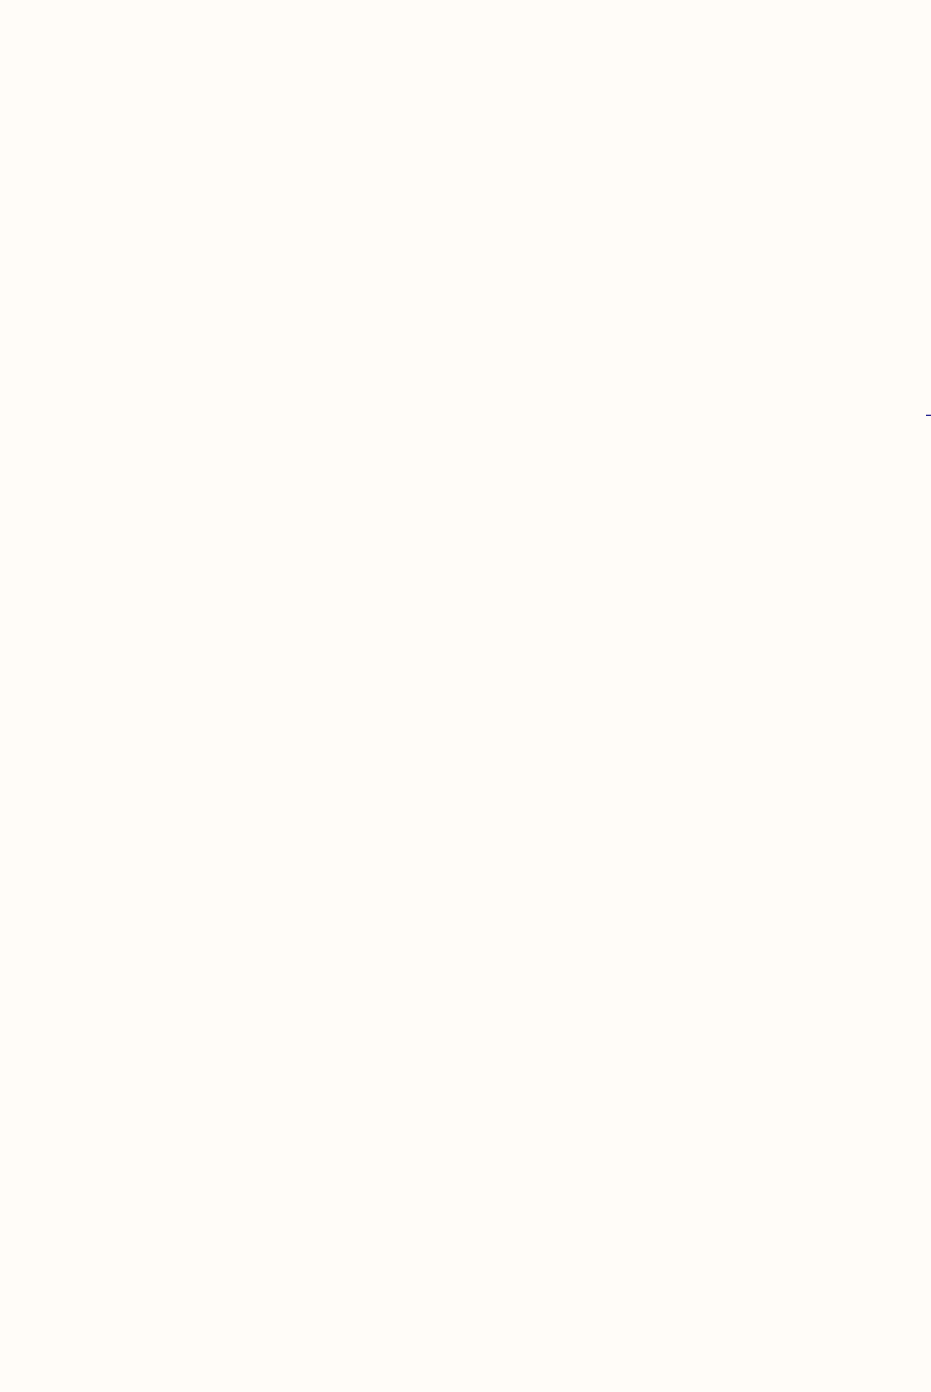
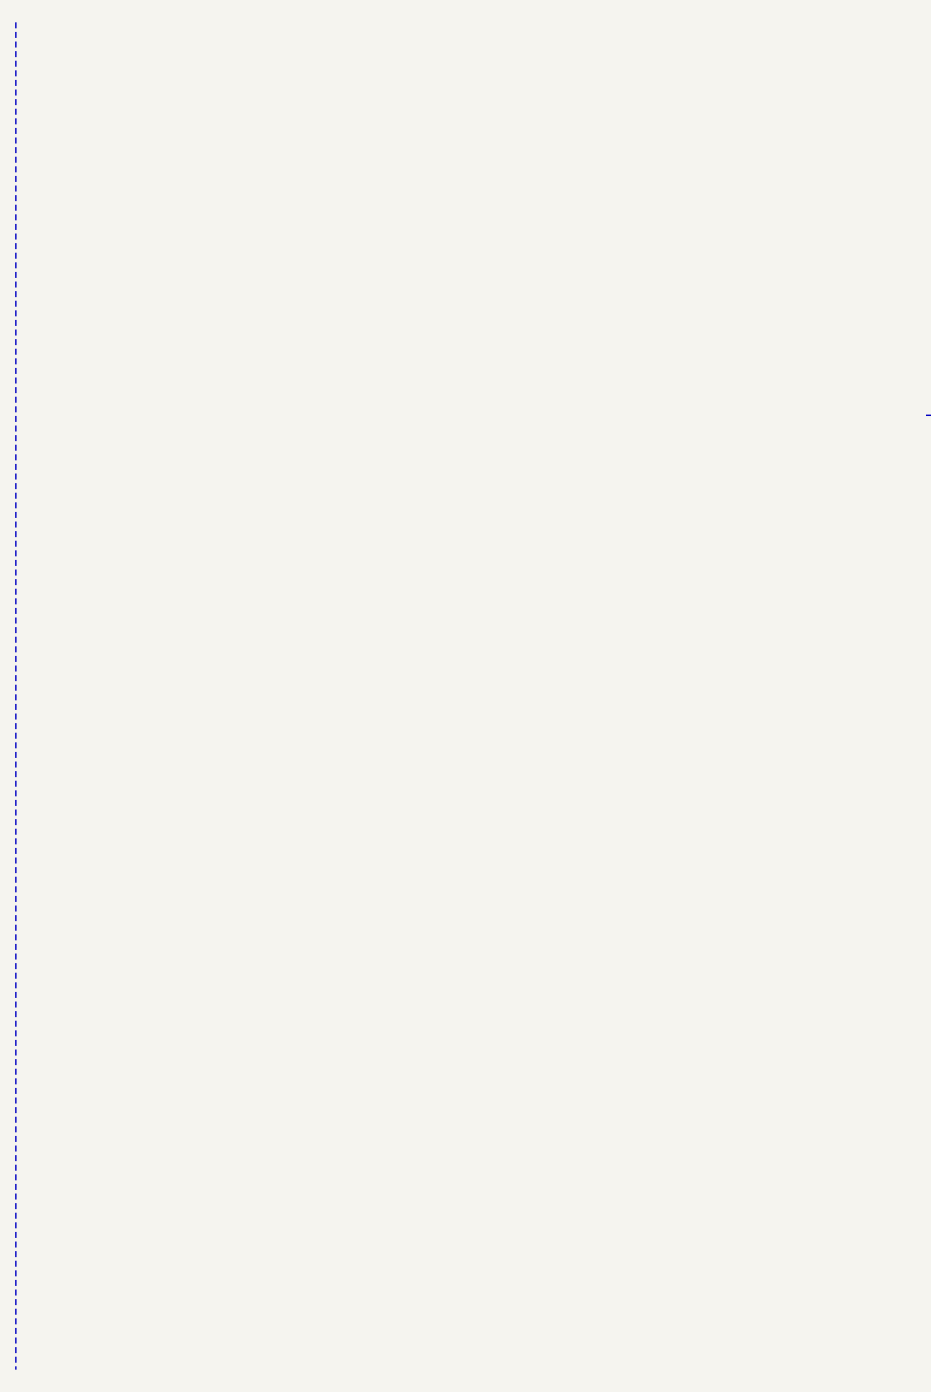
line: none -> (15, 22) (15, 1369)

